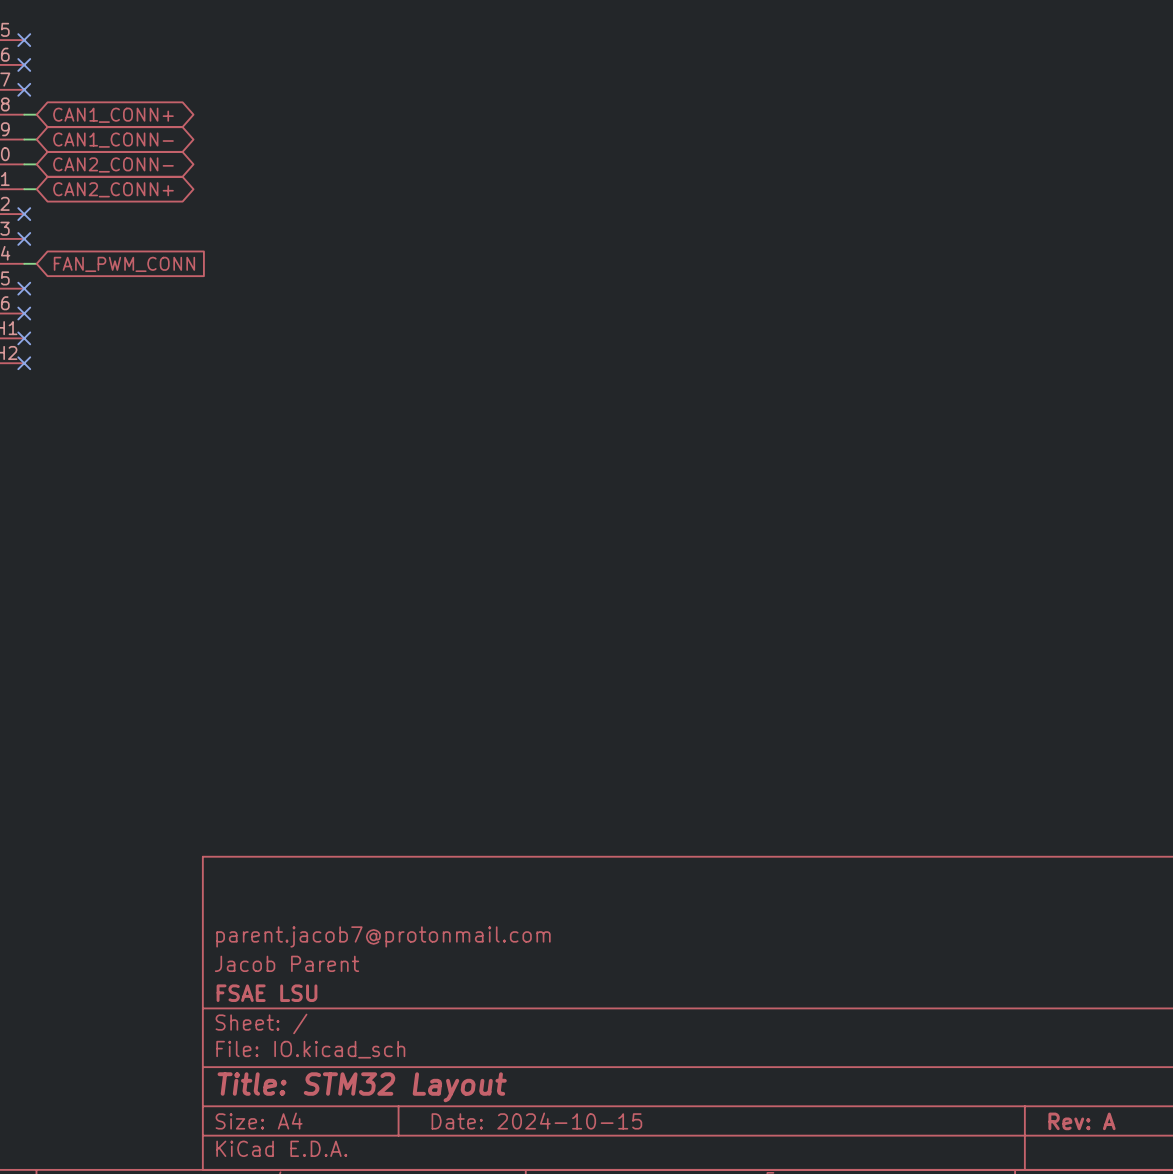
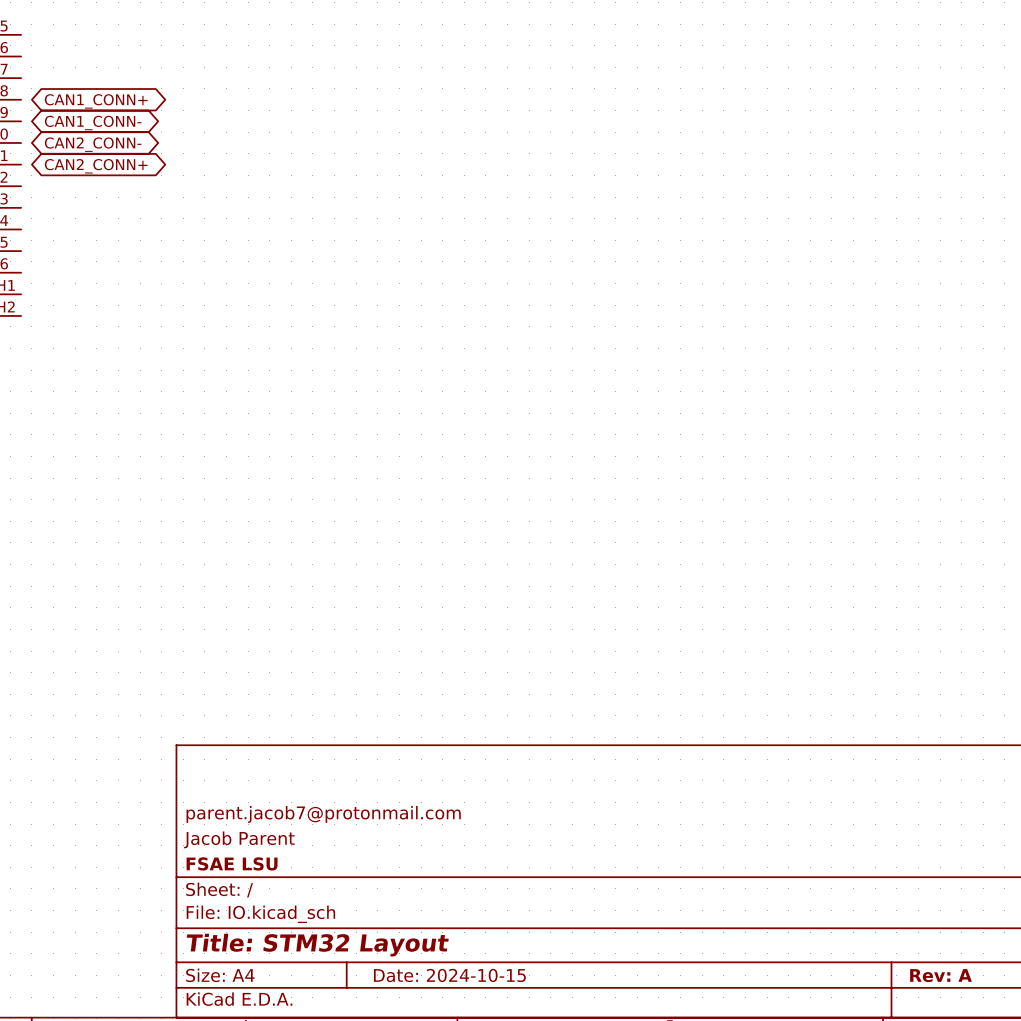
no-connect mark: (24, 40) -> none
no-connect mark: (24, 64) -> none
no-connect mark: (24, 89) -> none
wire: (24, 114) (36, 114) -> none
wire: (24, 139) (36, 139) -> none
wire: (24, 164) (36, 164) -> none
wire: (24, 189) (36, 189) -> none
no-connect mark: (24, 214) -> none
no-connect mark: (24, 238) -> none
wire: (24, 263) (36, 263) -> none
global label: FAN_PWM_CONN (124, 264) -> none
no-connect mark: (24, 288) -> none
no-connect mark: (24, 313) -> none
no-connect mark: (24, 338) -> none
no-connect mark: (24, 363) -> none

